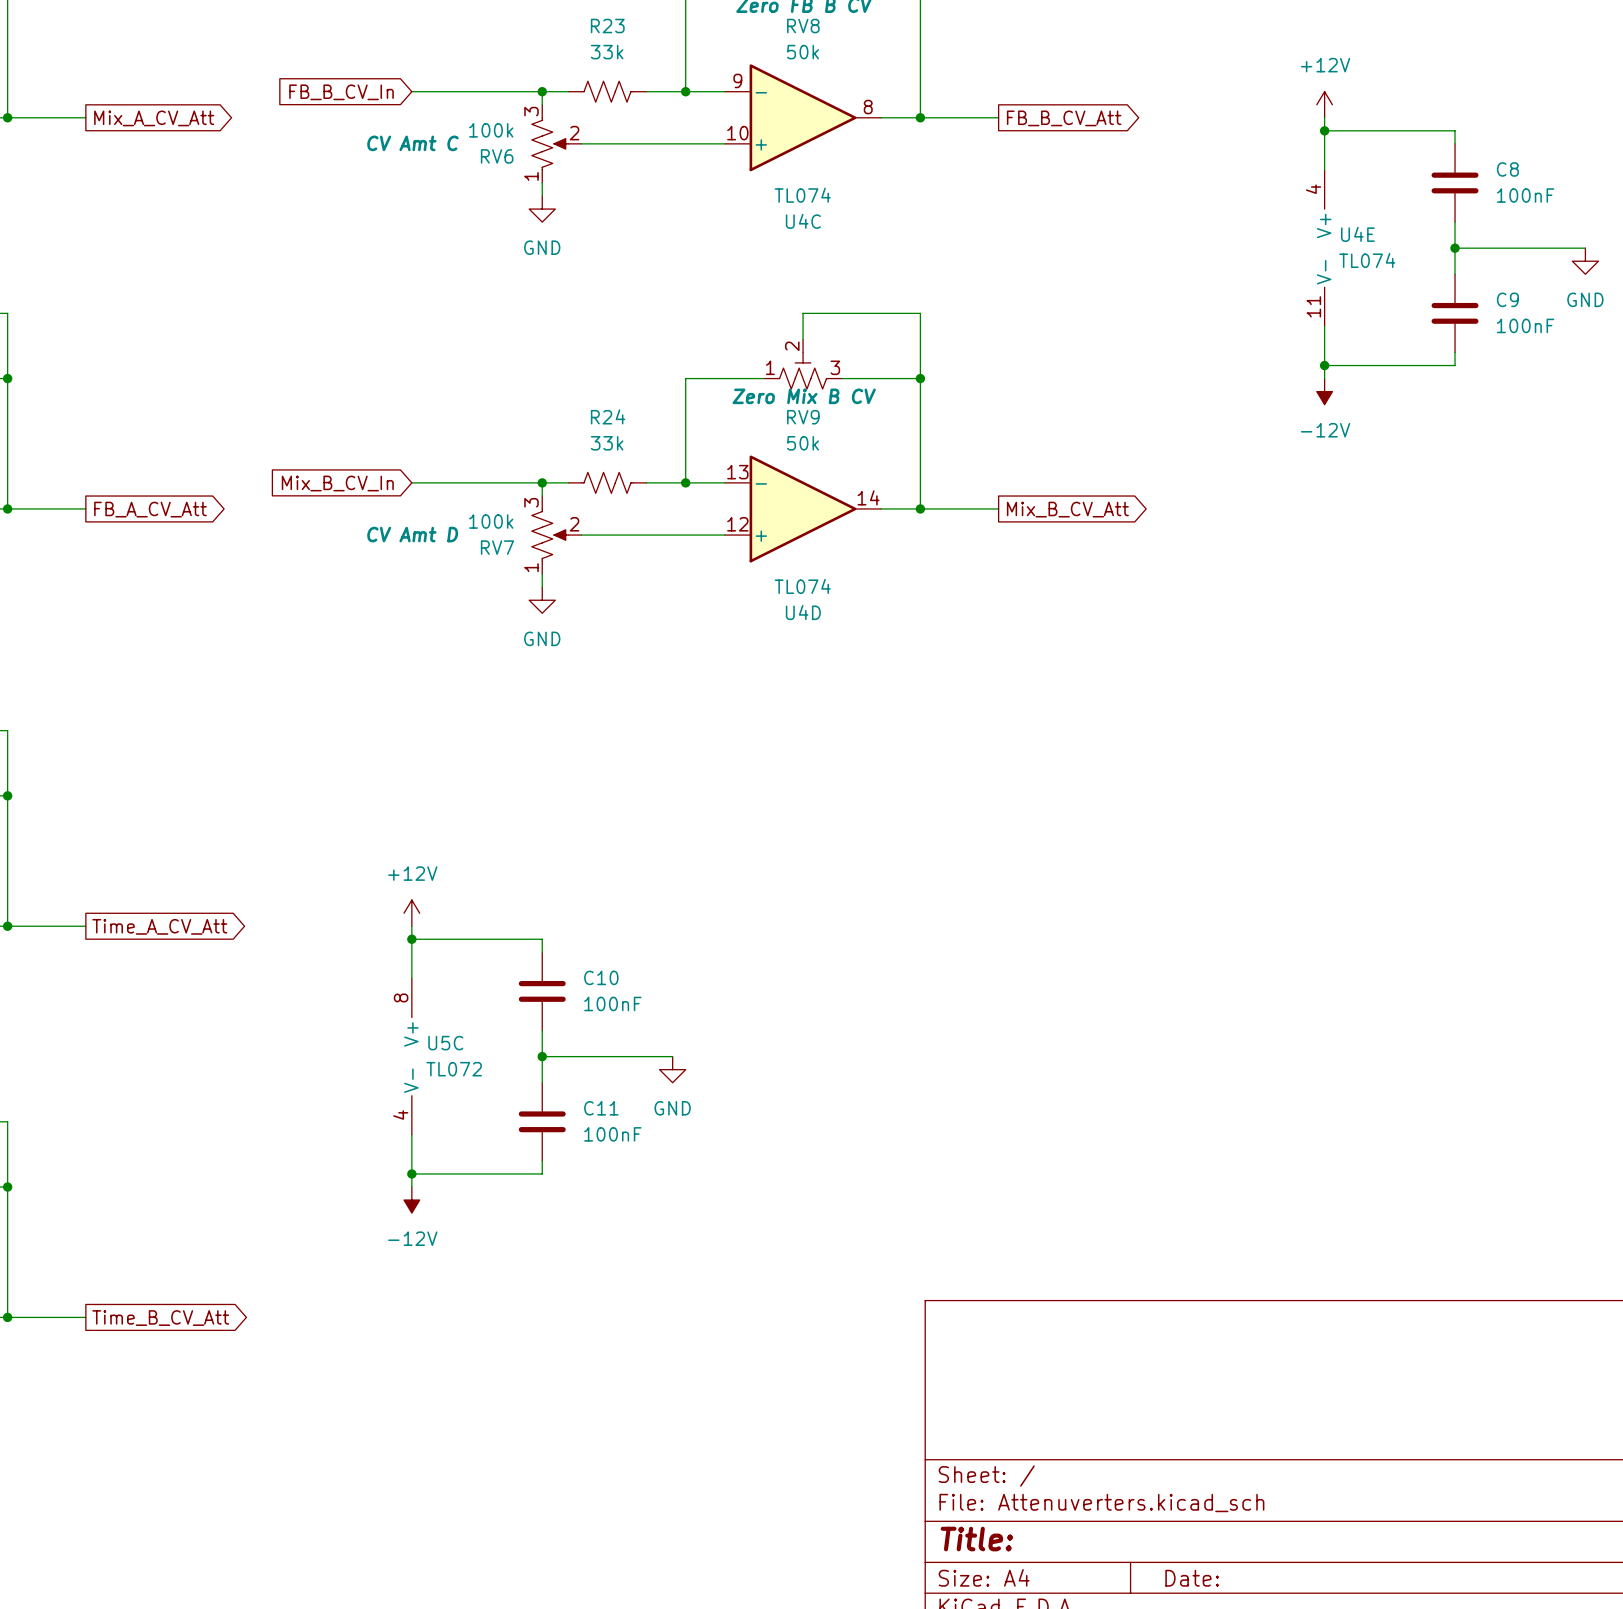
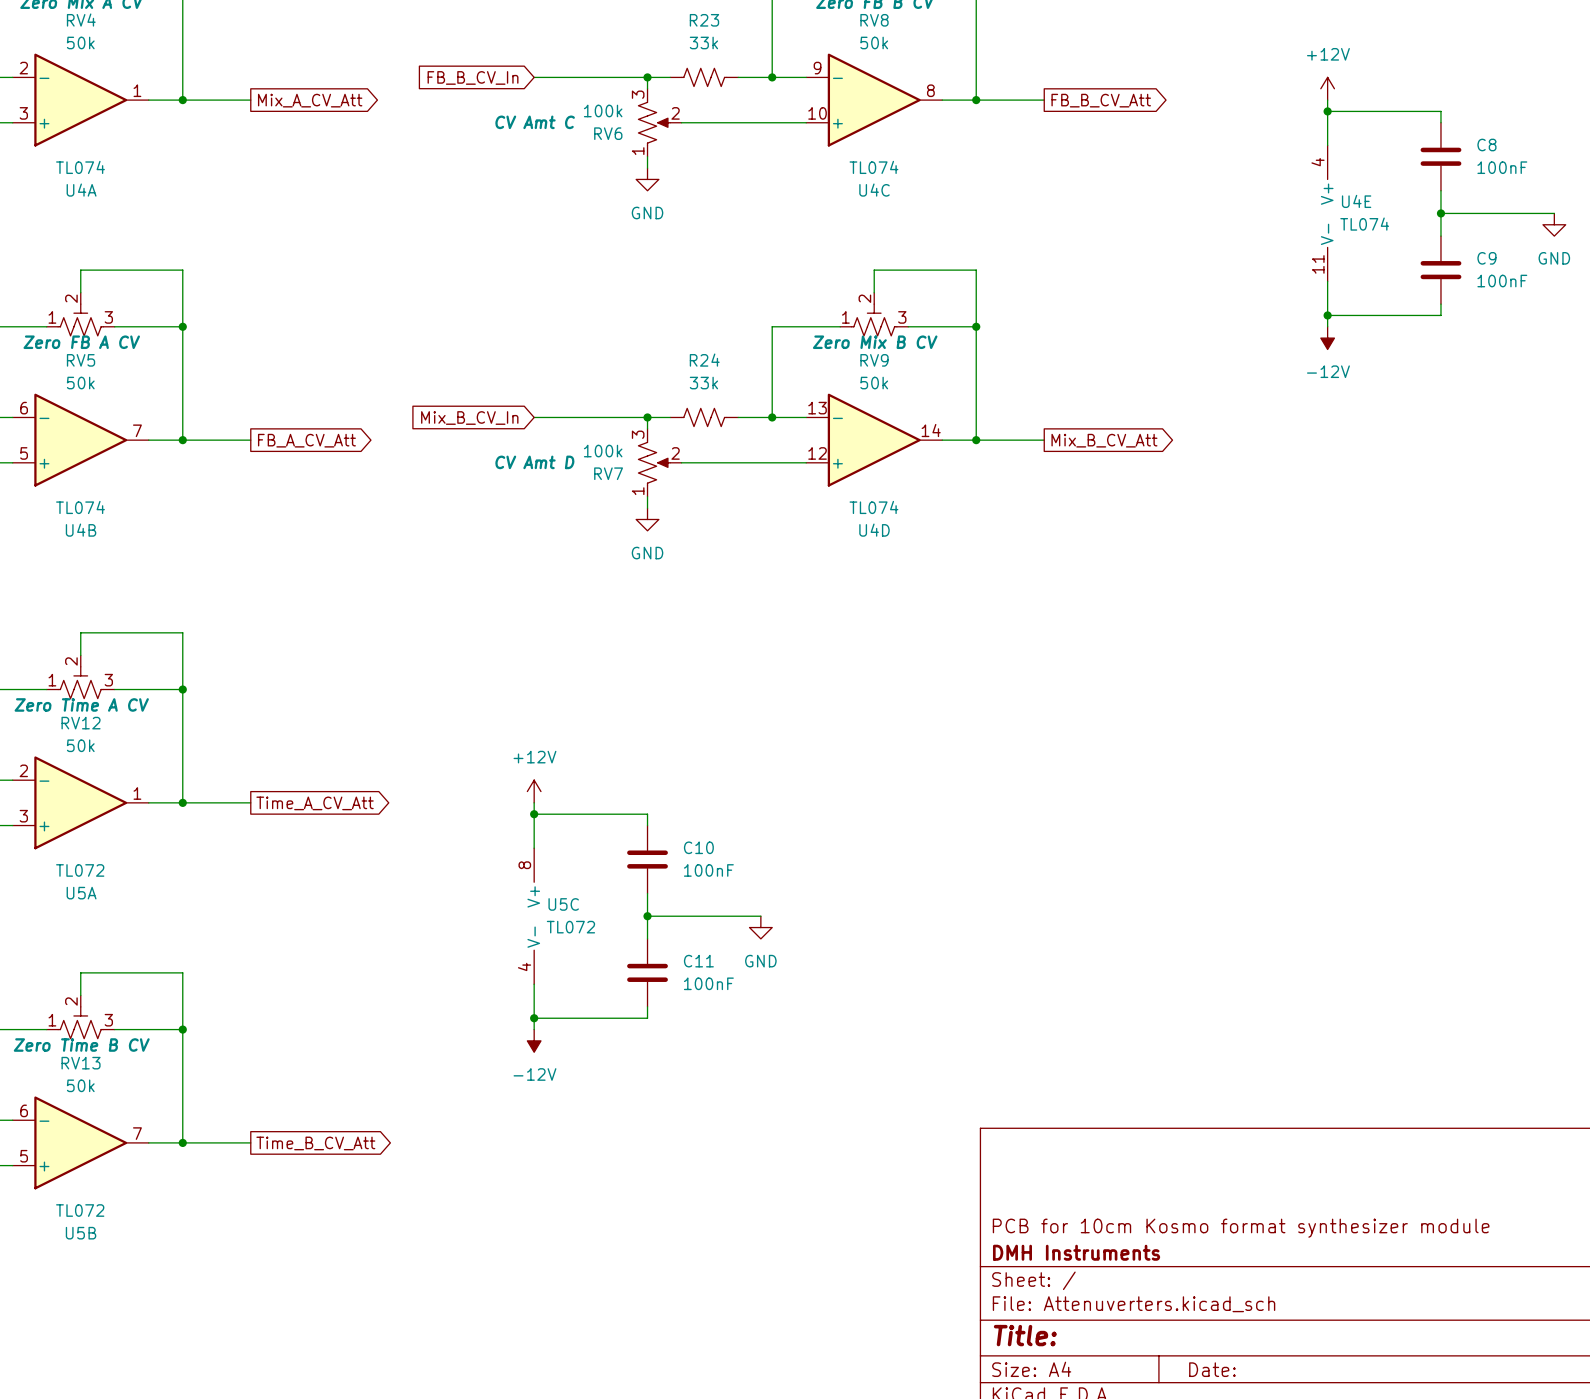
title block: none -> PCB for 10cm Kosmo format synthesizer module (1241, 1228)
title block: none -> DMH Instruments (1076, 1252)

